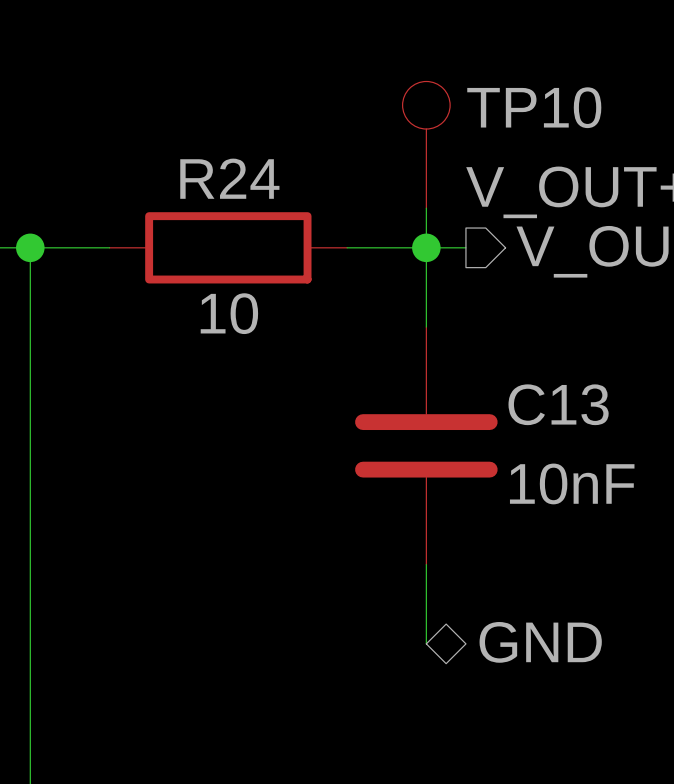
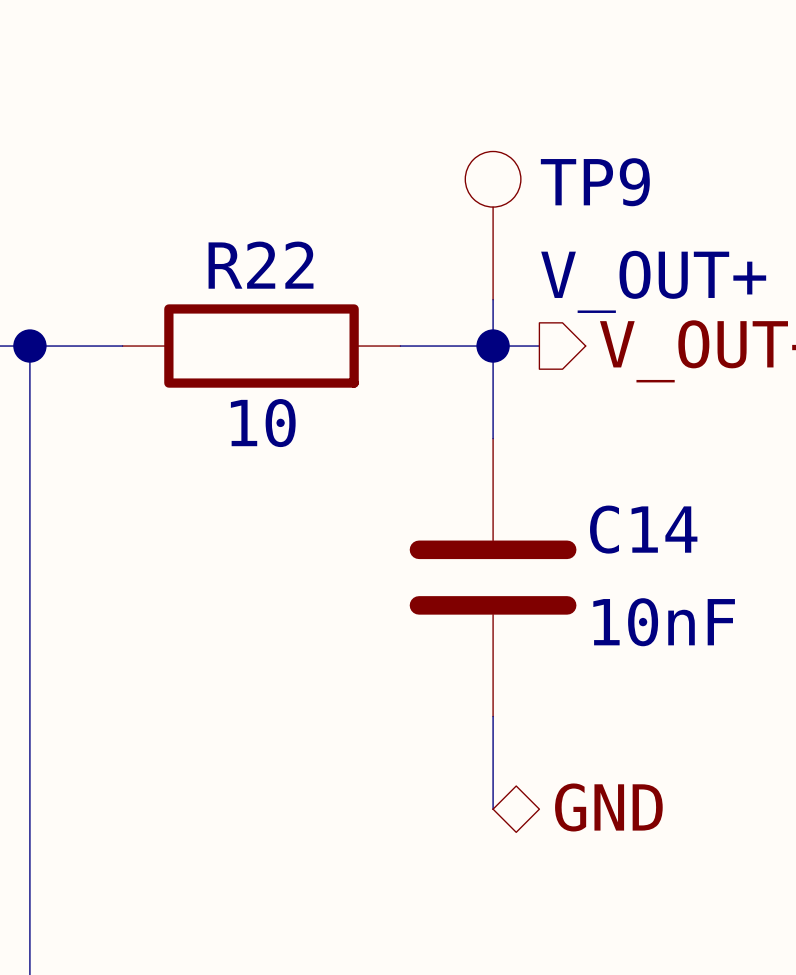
TP10 name: TP10 (534, 107) -> TP9 (595, 182)
R24 name: R24 (229, 178) -> R22 (261, 265)
C13 name: C13 (558, 404) -> C14 (643, 529)

